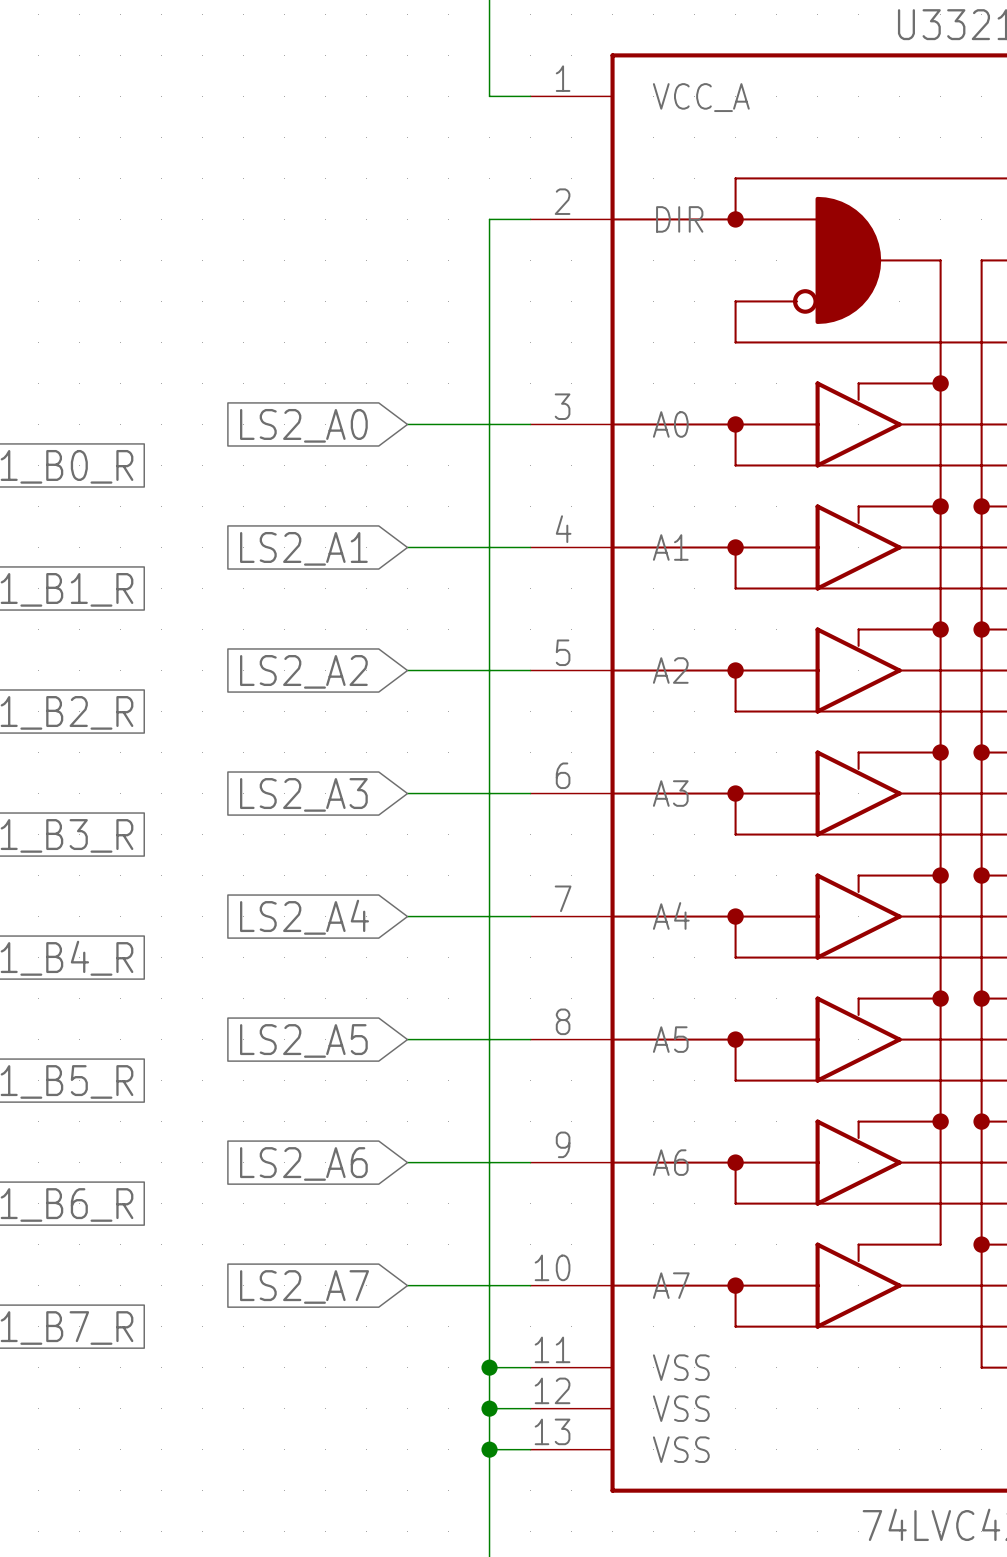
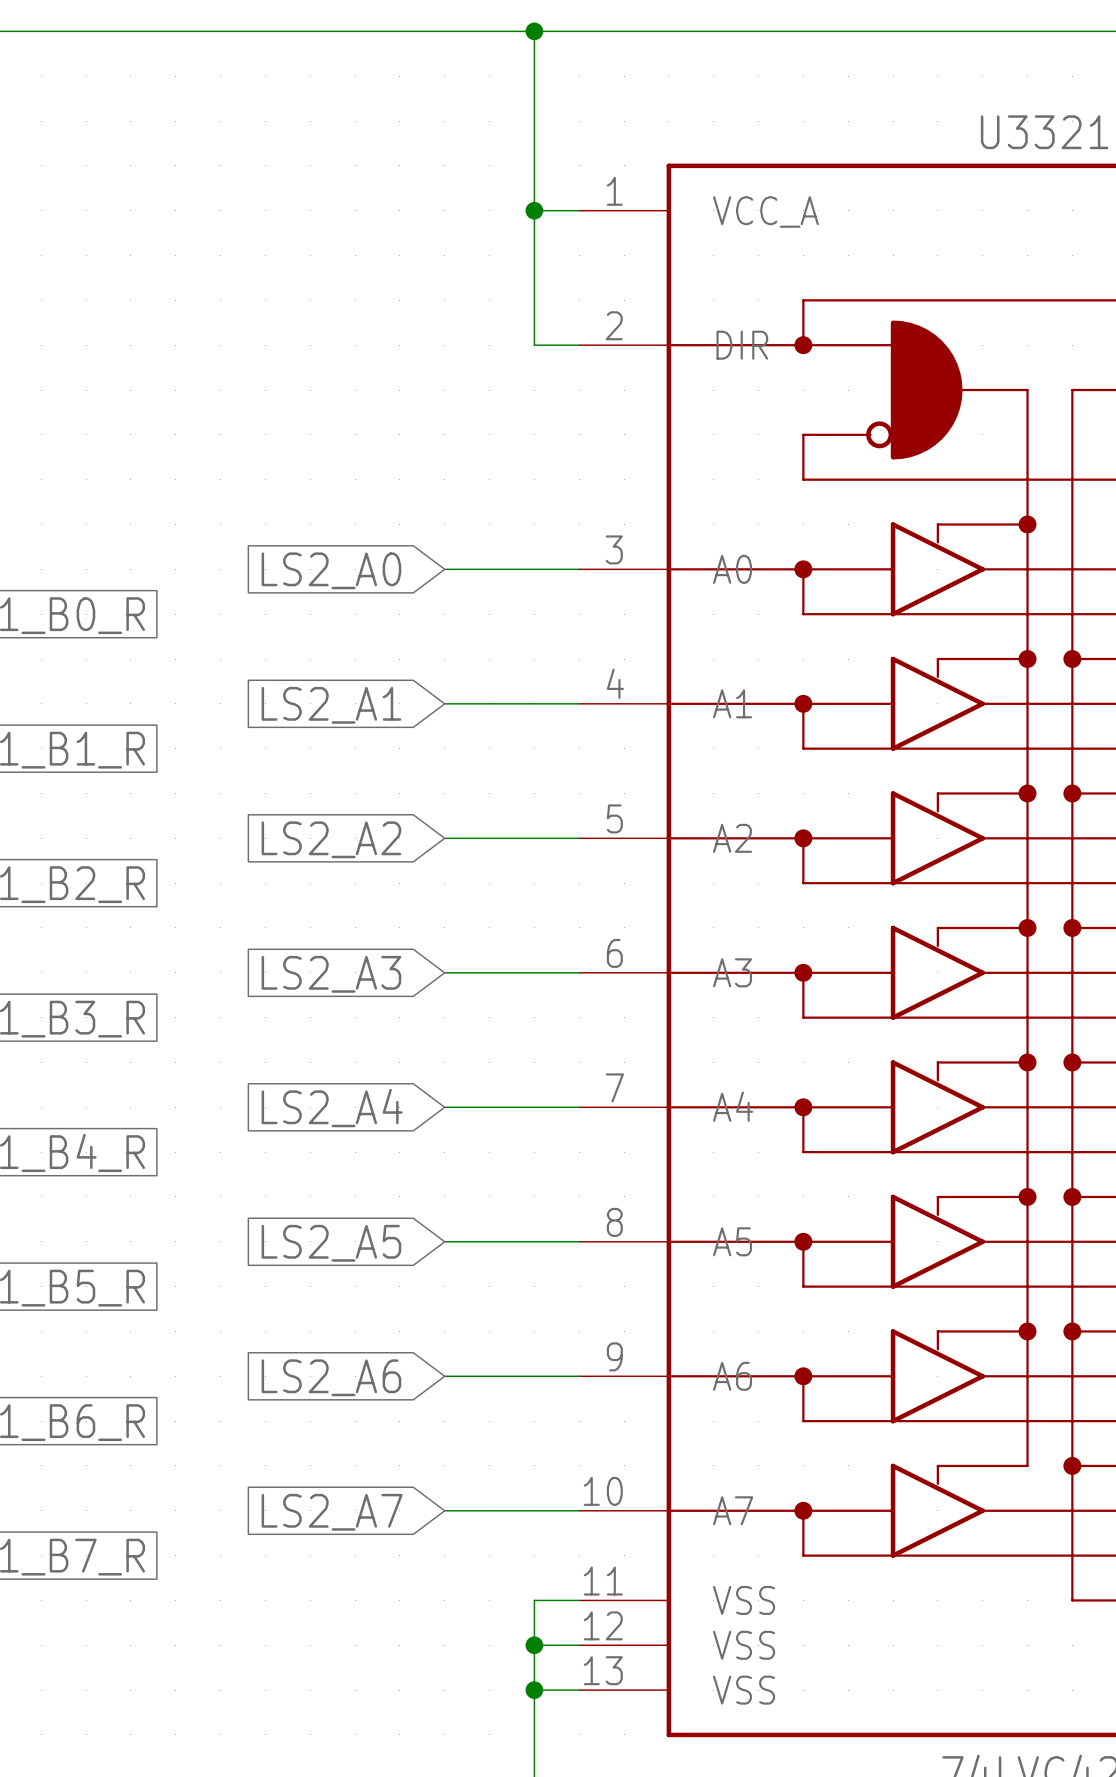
junction: none -> (534, 210)
wire: (489, 219) (489, 1367) -> (534, 345) (534, 210)
junction: (489, 1367) -> none

